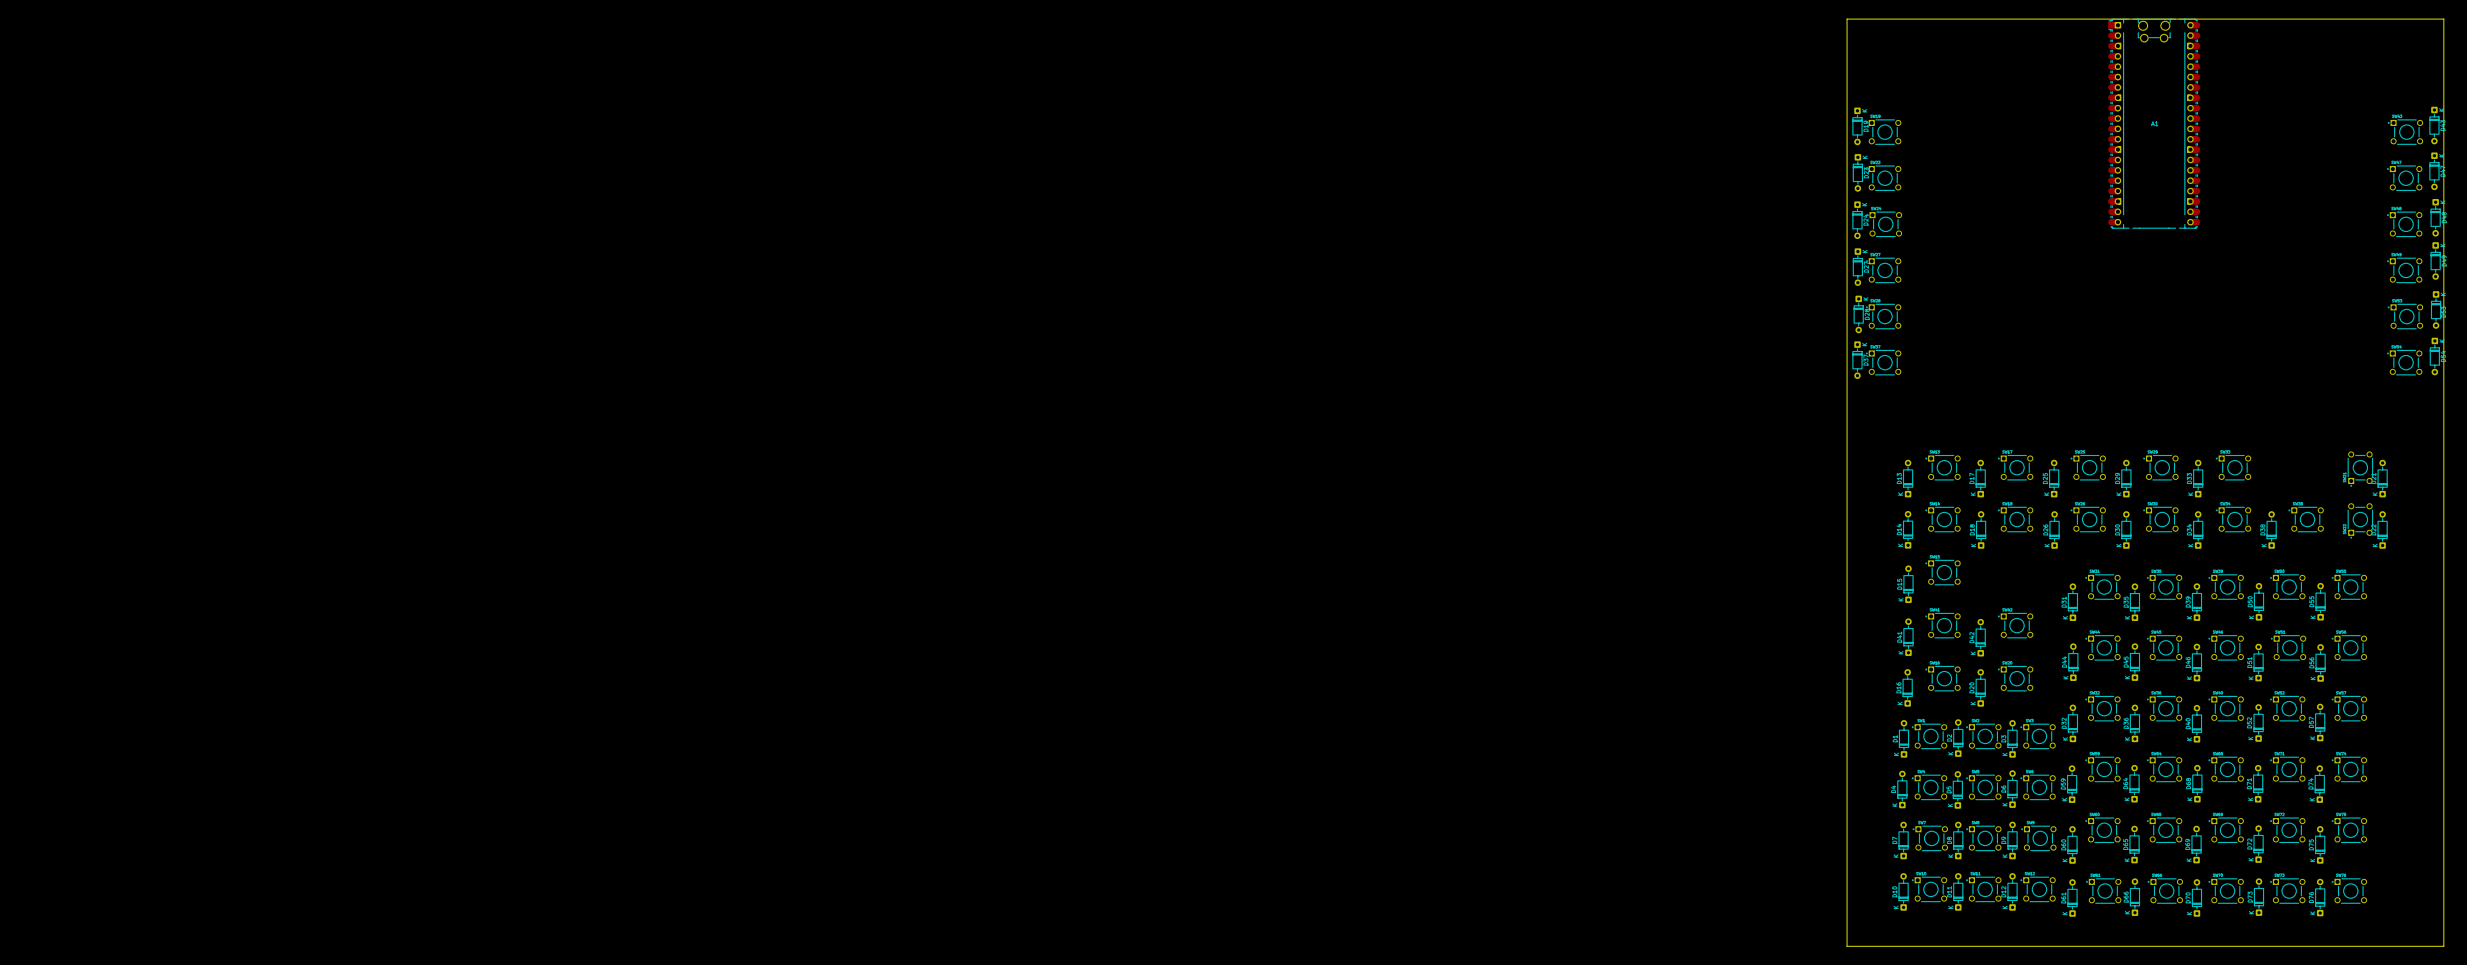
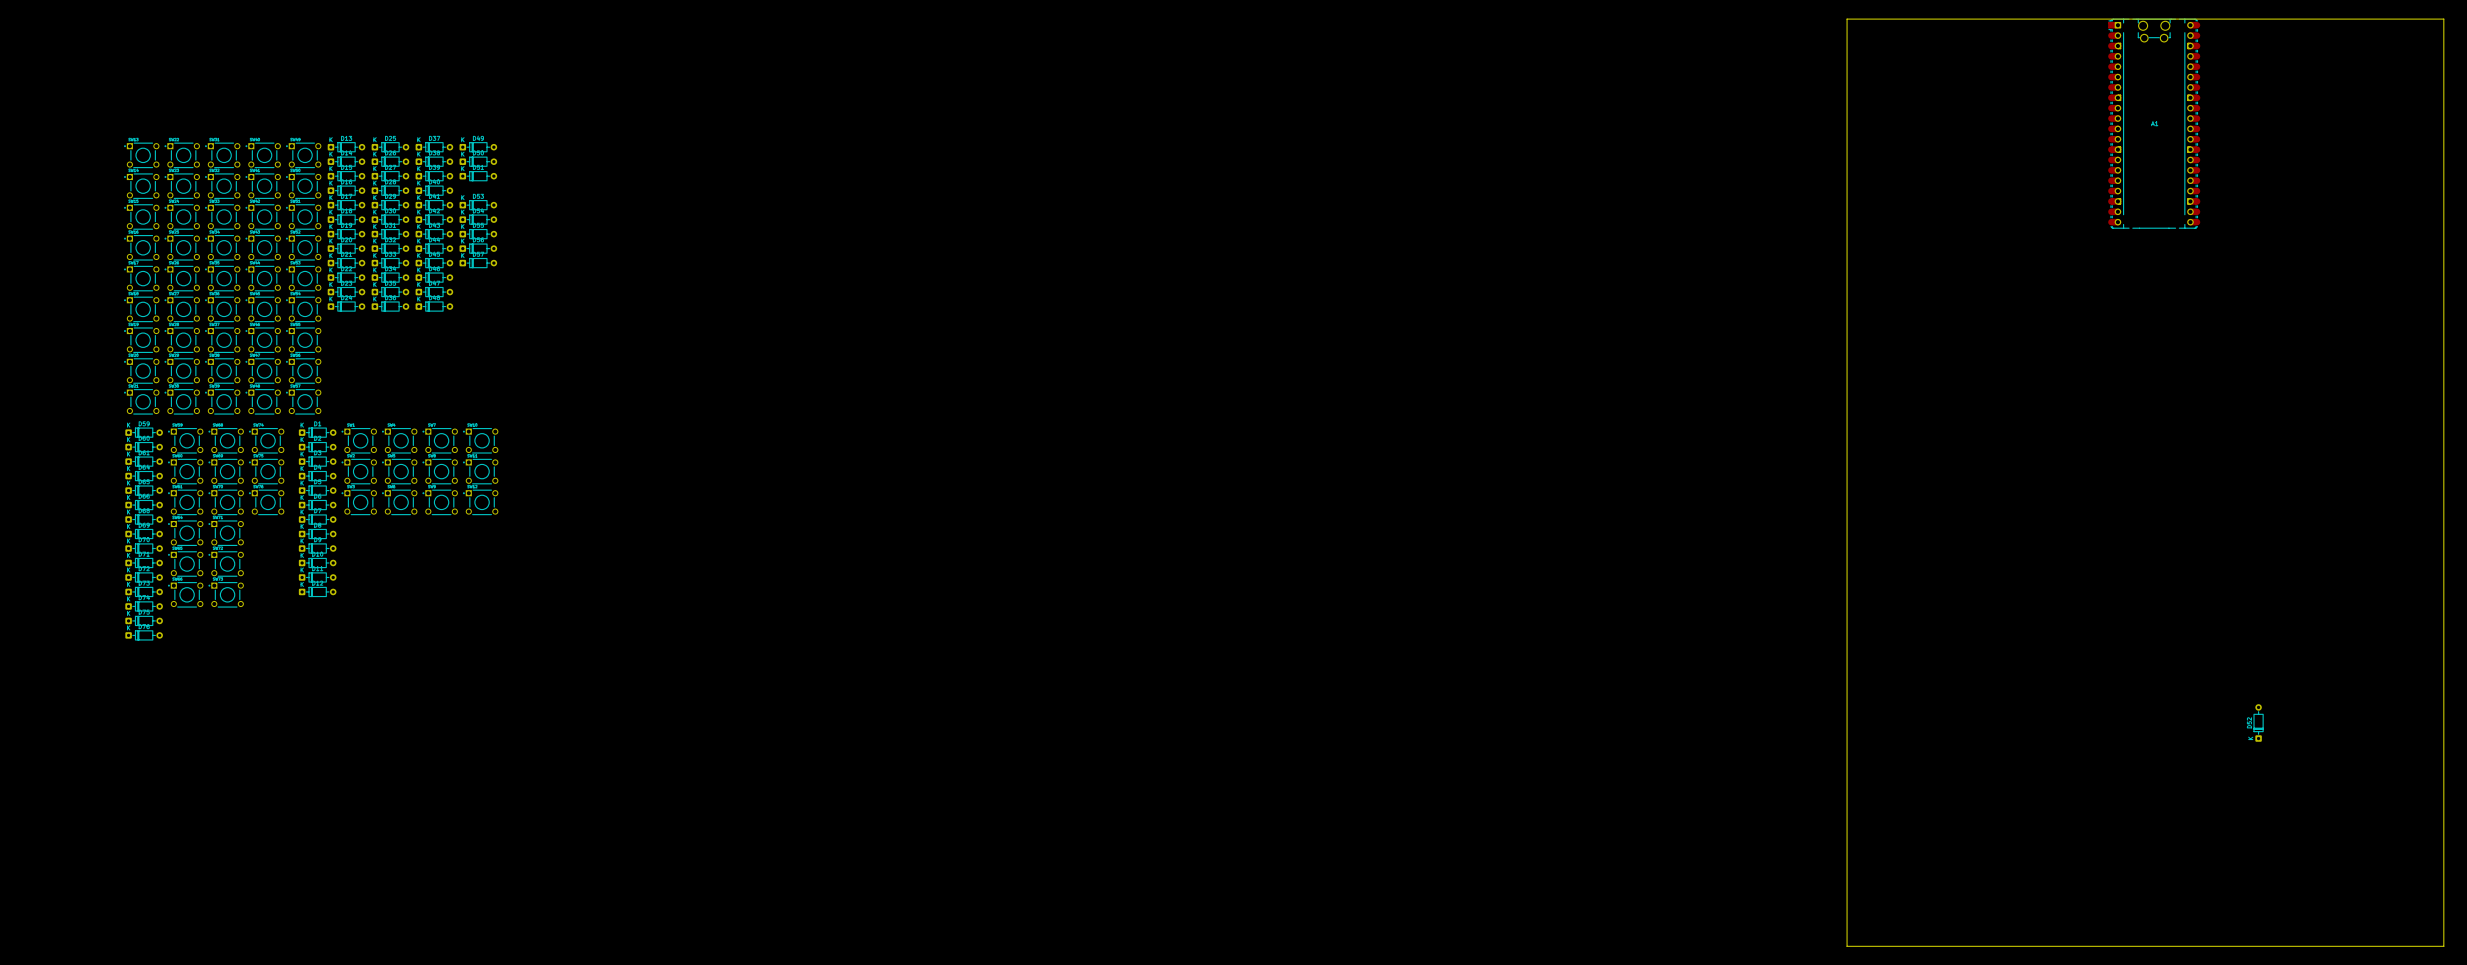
part rotation: 0° (2434, 125) -> 90° counterclockwise (434, 234)
part position: (2434, 125) -> (434, 234)
part rotation: 0° (1857, 126) -> 90° counterclockwise (346, 234)
part position: (1857, 126) -> (346, 234)
part position: (1883, 132) -> (141, 340)
part position: (2405, 132) -> (263, 247)
part rotation: 0° (2434, 171) -> 90° counterclockwise (434, 292)
part position: (2434, 171) -> (434, 292)
part rotation: 0° (1857, 172) -> 90° counterclockwise (346, 292)
part position: (1857, 172) -> (346, 292)
part position: (1883, 178) -> (182, 186)
part position: (2404, 178) -> (263, 371)
part rotation: 0° (2435, 217) -> 90° counterclockwise (434, 306)
part position: (2435, 217) -> (434, 306)
part rotation: 0° (1857, 220) -> 90° counterclockwise (346, 306)
part position: (1857, 220) -> (346, 306)
part position: (1884, 224) -> (182, 216)
part position: (2404, 224) -> (263, 401)
part rotation: 0° (2435, 261) -> 90° counterclockwise (478, 147)
part position: (2435, 261) -> (478, 147)
part rotation: 0° (1857, 267) -> 90° counterclockwise (390, 176)
part position: (1857, 267) -> (390, 176)
part position: (1883, 270) -> (182, 309)
part position: (2404, 270) -> (303, 155)
part rotation: 0° (2436, 309) -> 90° counterclockwise (478, 205)
part position: (2436, 309) -> (478, 205)
part rotation: 0° (1858, 314) -> 90° counterclockwise (390, 190)
part position: (1858, 314) -> (390, 190)
part position: (1883, 316) -> (182, 340)
part position: (2405, 316) -> (303, 278)
part rotation: 0° (2434, 356) -> 90° counterclockwise (478, 219)
part position: (2434, 356) -> (478, 219)
part rotation: 0° (1857, 360) -> 90° counterclockwise (434, 147)
part position: (1857, 360) -> (434, 147)
part position: (1883, 362) -> (222, 340)
part position: (2404, 362) -> (303, 309)
part position: (1943, 467) -> (141, 155)
part position: (2015, 467) -> (141, 278)
part position: (2088, 467) -> (182, 247)
part position: (2160, 467) -> (182, 371)
part position: (2233, 467) -> (222, 216)
part rotation: 0° (2360, 469) -> 90° clockwise (141, 401)
part position: (2360, 469) -> (141, 401)
part rotation: 0° (1908, 478) -> 90° clockwise (346, 147)
part position: (1908, 478) -> (346, 147)
part rotation: 0° (1980, 478) -> 90° clockwise (346, 205)
part position: (1980, 478) -> (346, 205)
part rotation: 0° (2054, 478) -> 90° clockwise (390, 147)
part position: (2054, 478) -> (390, 147)
part rotation: 0° (2126, 478) -> 90° clockwise (390, 205)
part position: (2126, 478) -> (390, 205)
part rotation: 0° (2198, 478) -> 90° clockwise (390, 263)
part position: (2198, 478) -> (390, 263)
part rotation: 0° (2382, 478) -> 90° clockwise (346, 263)
part position: (2382, 478) -> (346, 263)
part position: (1943, 519) -> (141, 186)
part position: (2015, 519) -> (141, 309)
part position: (2088, 519) -> (182, 278)
part position: (2160, 519) -> (182, 401)
part position: (2233, 519) -> (222, 247)
part position: (2306, 519) -> (222, 371)
part rotation: 0° (2360, 520) -> 90° clockwise (182, 155)
part position: (2360, 520) -> (182, 155)
part rotation: 0° (1908, 529) -> 90° clockwise (346, 161)
part position: (1908, 529) -> (346, 161)
part rotation: 0° (1981, 529) -> 90° clockwise (346, 219)
part position: (1981, 529) -> (346, 219)
part rotation: 0° (2054, 529) -> 90° clockwise (390, 161)
part position: (2054, 529) -> (390, 161)
part rotation: 0° (2126, 529) -> 90° clockwise (390, 219)
part position: (2126, 529) -> (390, 219)
part rotation: 0° (2198, 529) -> 90° clockwise (390, 277)
part position: (2198, 529) -> (390, 277)
part rotation: 0° (2271, 529) -> 90° clockwise (434, 161)
part position: (2271, 529) -> (434, 161)
part rotation: 0° (2382, 529) -> 90° clockwise (346, 277)
part position: (2382, 529) -> (346, 277)
part position: (1943, 572) -> (141, 216)
part rotation: 0° (1908, 584) -> 90° clockwise (346, 176)
part position: (1908, 584) -> (346, 176)
part position: (2103, 587) -> (222, 155)
part position: (2164, 587) -> (222, 278)
part position: (2226, 587) -> (222, 401)
part position: (2287, 587) -> (303, 186)
part position: (2349, 587) -> (303, 340)
part rotation: 0° (2258, 601) -> 90° clockwise (478, 161)
part position: (2258, 601) -> (478, 161)
part rotation: 0° (2320, 601) -> 90° clockwise (478, 234)
part position: (2320, 601) -> (478, 234)
part rotation: 0° (2072, 602) -> 90° clockwise (390, 234)
part position: (2072, 602) -> (390, 234)
part rotation: 0° (2134, 602) -> 90° clockwise (390, 292)
part position: (2134, 602) -> (390, 292)
part rotation: 0° (2196, 602) -> 90° clockwise (434, 176)
part position: (2196, 602) -> (434, 176)
part position: (1943, 625) -> (263, 186)
part position: (2015, 625) -> (263, 216)
part rotation: 0° (1908, 637) -> 90° clockwise (434, 205)
part position: (1908, 637) -> (434, 205)
part rotation: 0° (1980, 637) -> 90° clockwise (434, 219)
part position: (1980, 637) -> (434, 219)
part position: (2103, 647) -> (263, 278)
part position: (2164, 647) -> (263, 309)
part position: (2226, 647) -> (263, 340)
part position: (2288, 647) -> (303, 216)
part position: (2349, 647) -> (303, 371)
part rotation: 0° (2073, 662) -> 90° clockwise (434, 248)
part position: (2073, 662) -> (434, 248)
part rotation: 0° (2134, 662) -> 90° clockwise (434, 263)
part position: (2134, 662) -> (434, 263)
part rotation: 0° (2196, 662) -> 90° clockwise (434, 277)
part position: (2196, 662) -> (434, 277)
part rotation: 0° (2258, 662) -> 90° clockwise (478, 176)
part position: (2258, 662) -> (478, 176)
part rotation: 0° (2320, 662) -> 90° clockwise (478, 248)
part position: (2320, 662) -> (478, 248)
part position: (1943, 678) -> (141, 247)
part position: (2015, 678) -> (141, 371)
part rotation: 0° (1907, 687) -> 90° clockwise (346, 190)
part position: (1907, 687) -> (346, 190)
part rotation: 0° (1980, 687) -> 90° clockwise (346, 248)
part position: (1980, 687) -> (346, 248)
part position: (2103, 708) -> (222, 186)
part position: (2164, 708) -> (222, 309)
part position: (2226, 708) -> (263, 155)
part position: (2287, 708) -> (303, 247)
part position: (2349, 708) -> (303, 401)
part rotation: 0° (2320, 722) -> 90° clockwise (478, 263)
part position: (2320, 722) -> (478, 263)
part rotation: 0° (2072, 723) -> 90° clockwise (390, 248)
part position: (2072, 723) -> (390, 248)
part rotation: 0° (2134, 723) -> 90° clockwise (390, 306)
part position: (2134, 723) -> (390, 306)
part rotation: 0° (2196, 723) -> 90° clockwise (434, 190)
part position: (2196, 723) -> (434, 190)
part position: (1929, 736) -> (359, 440)
part position: (1983, 736) -> (359, 471)
part position: (2038, 736) -> (359, 502)
part rotation: 0° (1903, 738) -> 90° clockwise (317, 432)
part position: (1903, 738) -> (317, 432)
part rotation: 0° (1958, 738) -> 90° clockwise (317, 447)
part position: (1958, 738) -> (317, 447)
part rotation: 0° (2012, 738) -> 90° clockwise (317, 461)
part position: (2012, 738) -> (317, 461)
part position: (2103, 769) -> (185, 440)
part position: (2164, 769) -> (185, 533)
part position: (2226, 769) -> (226, 440)
part position: (2287, 769) -> (226, 533)
part position: (2349, 769) -> (266, 440)
part rotation: 0° (2134, 783) -> 90° clockwise (144, 476)
part position: (2134, 783) -> (144, 476)
part rotation: 0° (2197, 783) -> 90° clockwise (144, 519)
part position: (2197, 783) -> (144, 519)
part rotation: 0° (2258, 783) -> 90° clockwise (144, 562)
part position: (2258, 783) -> (144, 562)
part rotation: 0° (2072, 784) -> 90° clockwise (144, 432)
part position: (2072, 784) -> (144, 432)
part rotation: 0° (2319, 784) -> 90° clockwise (144, 606)
part position: (2319, 784) -> (144, 606)
part position: (1929, 787) -> (399, 440)
part position: (1983, 787) -> (399, 471)
part position: (2038, 787) -> (399, 502)
part rotation: 0° (1902, 789) -> 90° clockwise (317, 476)
part position: (1902, 789) -> (317, 476)
part rotation: 0° (1957, 789) -> 90° clockwise (317, 490)
part position: (1957, 789) -> (317, 490)
part rotation: 0° (2012, 789) -> 90° clockwise (317, 505)
part position: (2012, 789) -> (317, 505)
part position: (2103, 830) -> (185, 471)
part position: (2164, 830) -> (185, 564)
part position: (2226, 830) -> (226, 471)
part position: (2287, 830) -> (226, 564)
part position: (2349, 830) -> (266, 471)
part position: (1930, 838) -> (440, 440)
part position: (1983, 838) -> (440, 471)
part position: (2038, 838) -> (440, 502)
part rotation: 0° (1903, 840) -> 90° clockwise (317, 519)
part position: (1903, 840) -> (317, 519)
part rotation: 0° (1958, 840) -> 90° clockwise (317, 534)
part position: (1958, 840) -> (317, 534)
part rotation: 0° (2012, 840) -> 90° clockwise (317, 548)
part position: (2012, 840) -> (317, 548)
part rotation: 0° (2072, 844) -> 90° clockwise (144, 447)
part position: (2072, 844) -> (144, 447)
part rotation: 0° (2134, 844) -> 90° clockwise (144, 490)
part position: (2134, 844) -> (144, 490)
part rotation: 0° (2196, 844) -> 90° clockwise (144, 534)
part position: (2196, 844) -> (144, 534)
part rotation: 0° (2258, 844) -> 90° clockwise (144, 577)
part position: (2258, 844) -> (144, 577)
part rotation: 0° (2320, 844) -> 90° clockwise (144, 620)
part position: (2320, 844) -> (144, 620)
part position: (1929, 889) -> (480, 440)
part position: (1983, 889) -> (480, 471)
part position: (2038, 889) -> (480, 502)
part rotation: 0° (1903, 891) -> 90° clockwise (317, 562)
part position: (1903, 891) -> (317, 562)
part rotation: 0° (1958, 891) -> 90° clockwise (317, 577)
part position: (1958, 891) -> (317, 577)
part rotation: 0° (2012, 891) -> 90° clockwise (317, 591)
part position: (2012, 891) -> (317, 591)
part position: (2103, 891) -> (185, 502)
part position: (2165, 891) -> (185, 594)
part position: (2226, 891) -> (226, 502)
part position: (2287, 891) -> (226, 594)
part position: (2349, 891) -> (266, 502)
part rotation: 0° (2072, 897) -> 90° clockwise (144, 461)
part position: (2072, 897) -> (144, 461)
part rotation: 0° (2134, 897) -> 90° clockwise (144, 505)
part position: (2134, 897) -> (144, 505)
part rotation: 0° (2196, 897) -> 90° clockwise (144, 548)
part position: (2196, 897) -> (144, 548)
part rotation: 0° (2258, 897) -> 90° clockwise (144, 591)
part position: (2258, 897) -> (144, 591)
part rotation: 0° (2320, 897) -> 90° clockwise (144, 635)
part position: (2320, 897) -> (144, 635)

